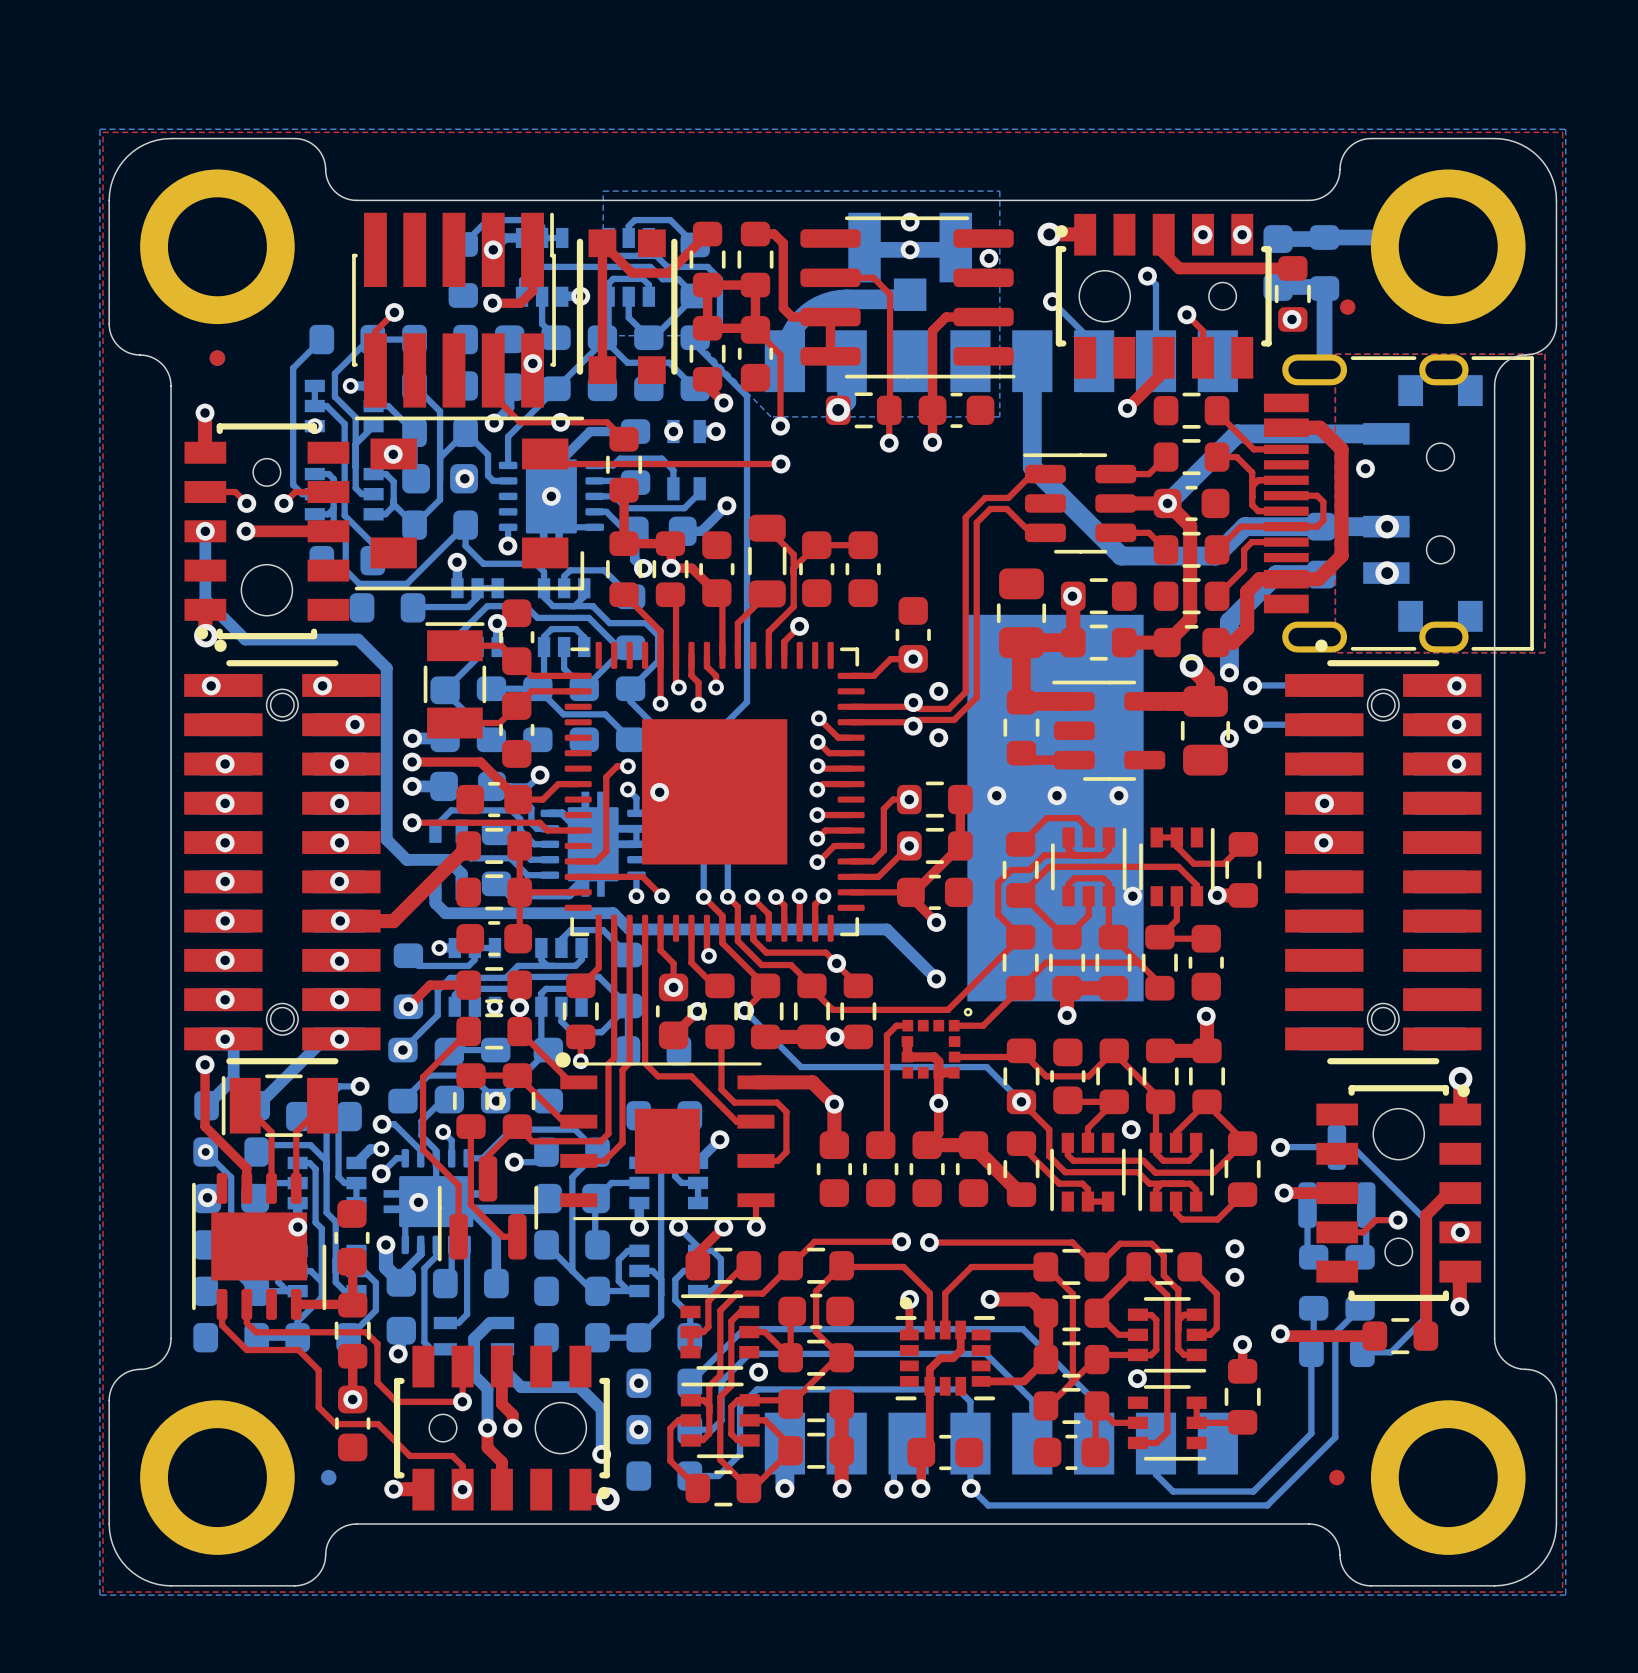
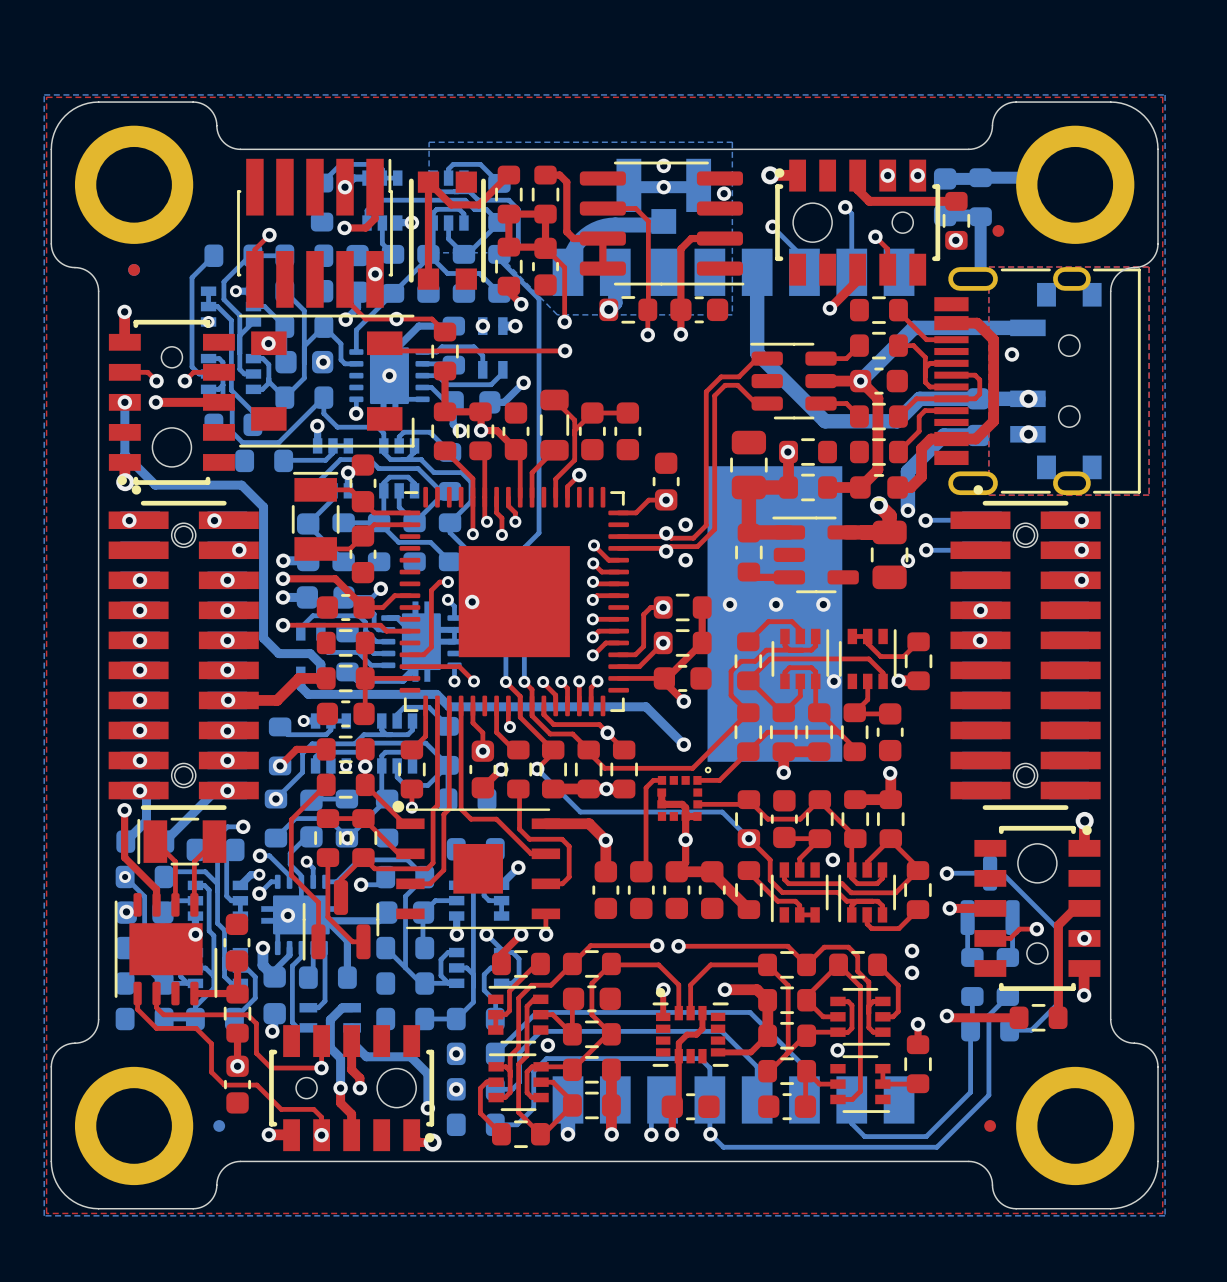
top track: (468, 845) (393, 921) -> (326, 678) (299, 678) (277, 700) (268, 700)

